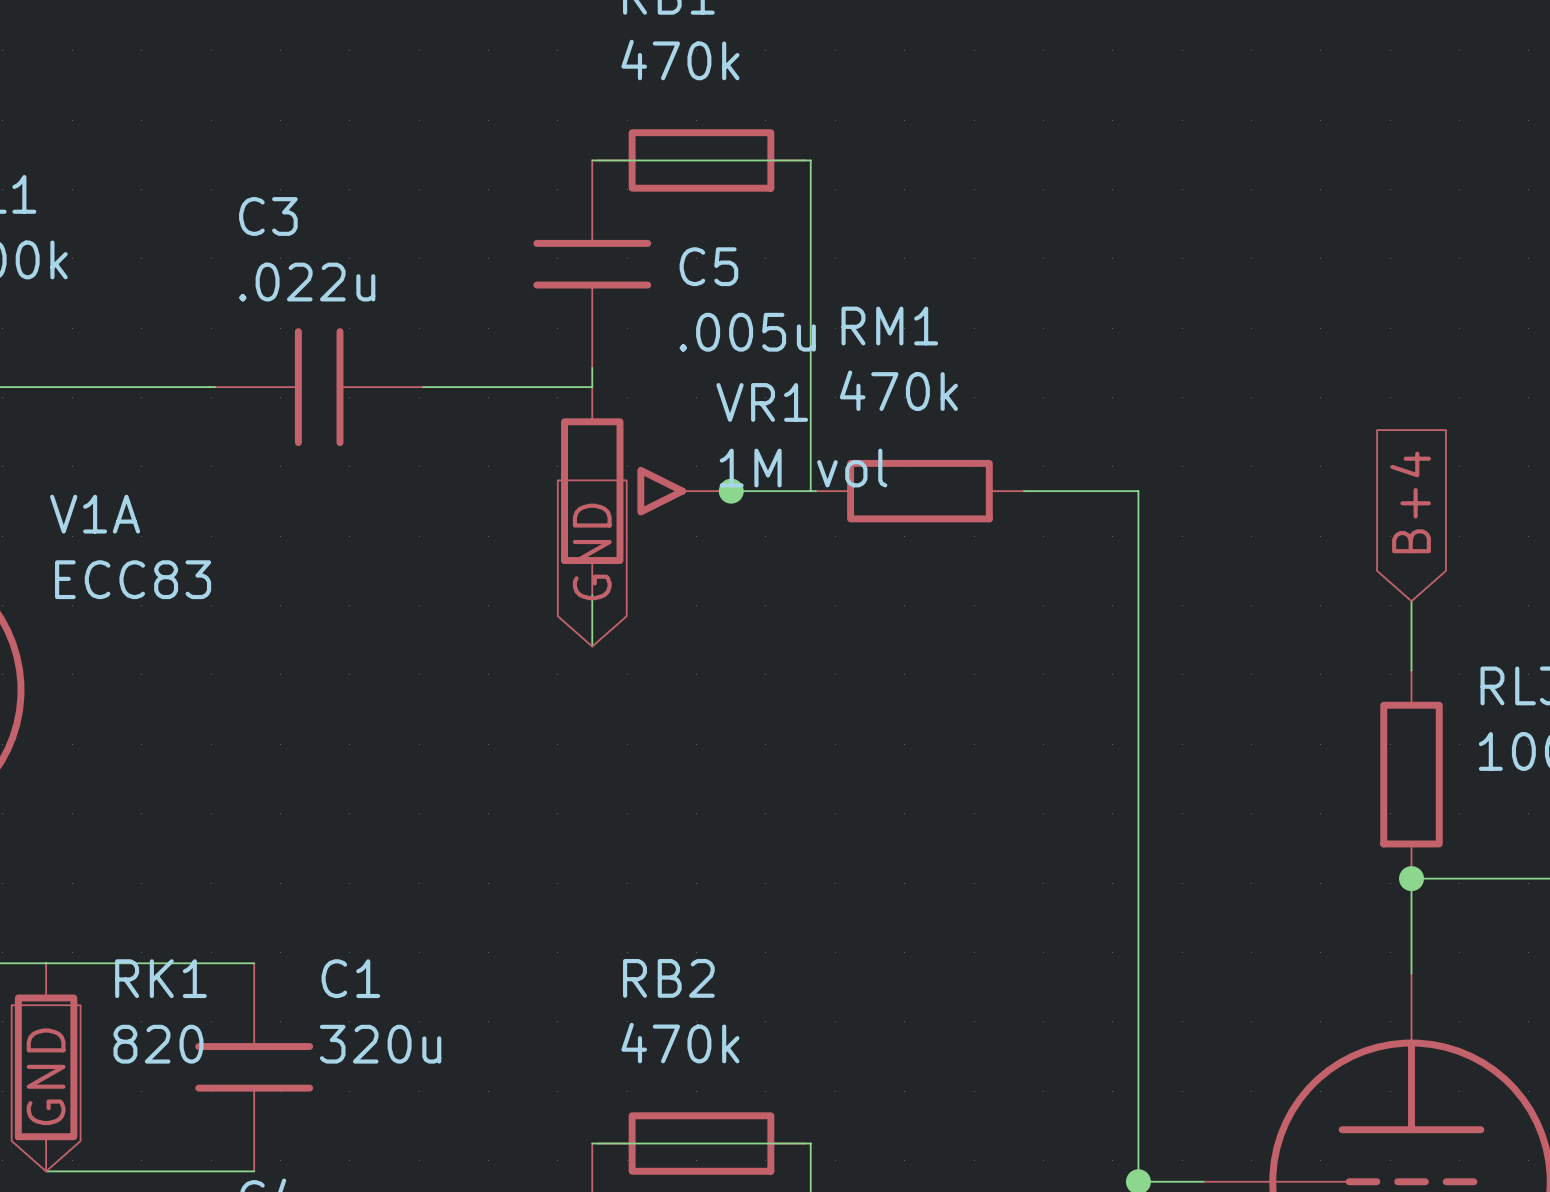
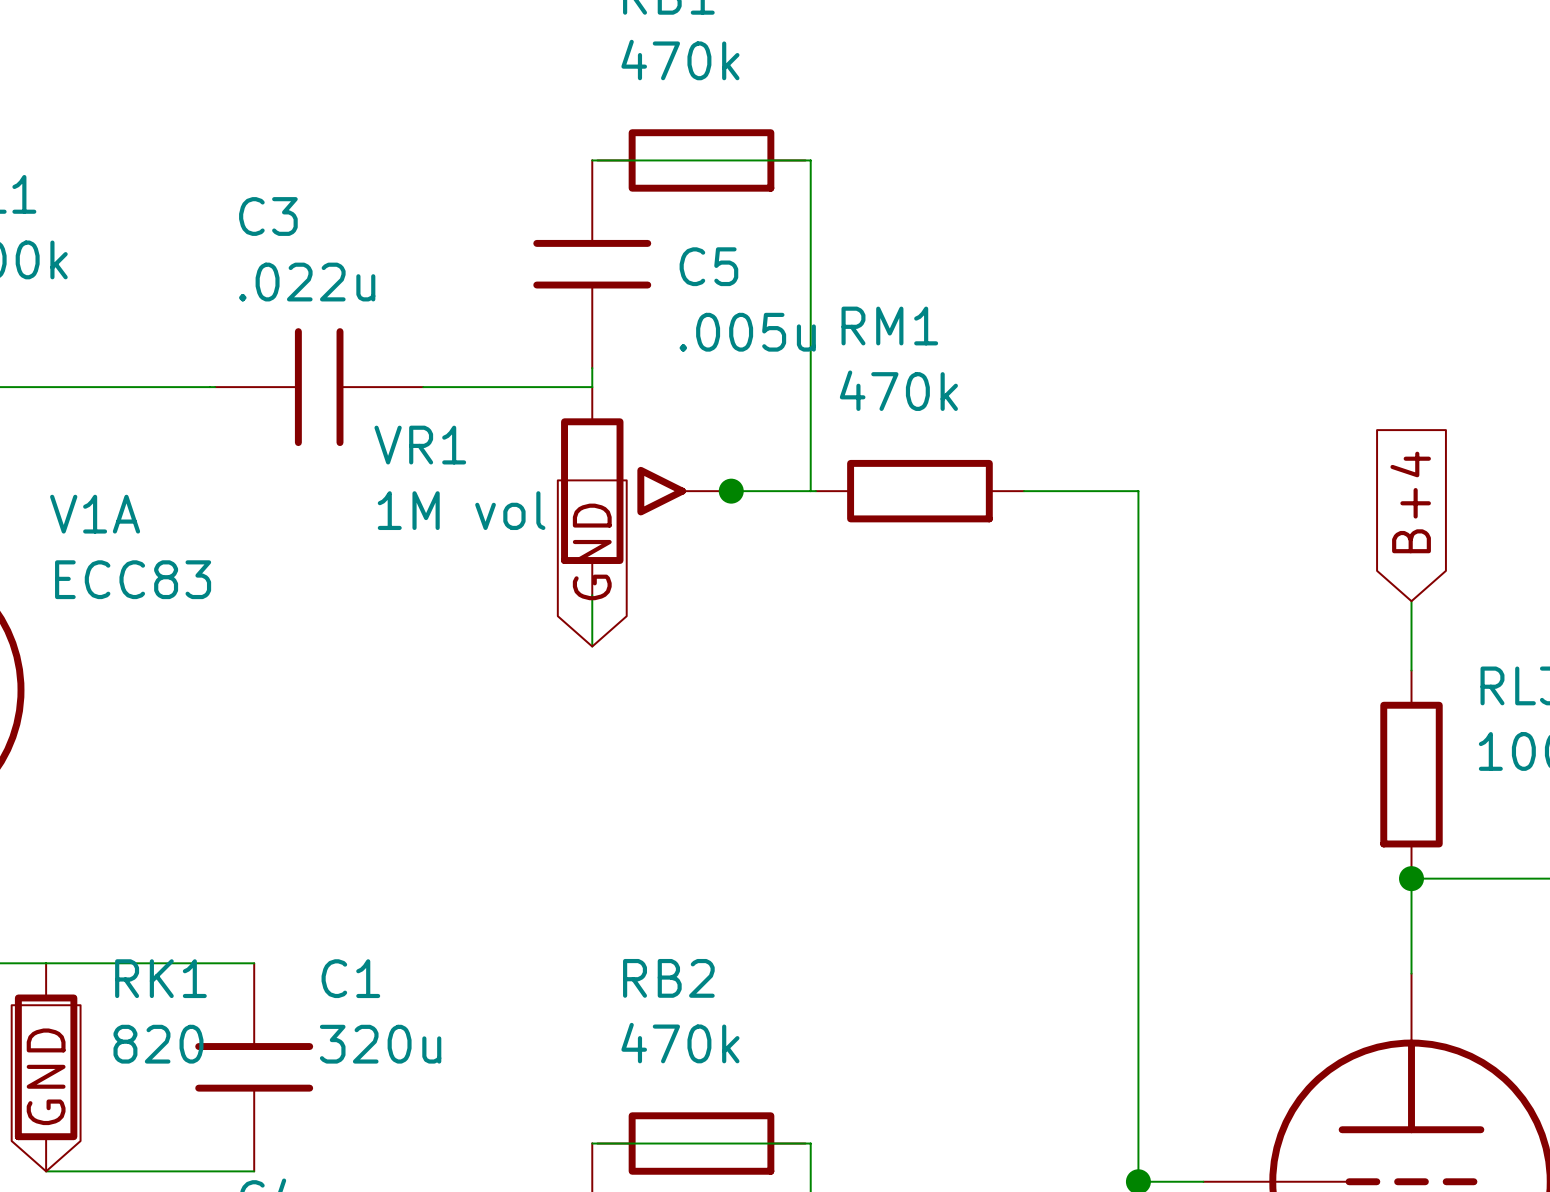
VR1 name position: VR1 (762, 402) -> VR1 (420, 445)
VR1 value position: 1M vol (803, 468) -> 1M vol (461, 510)

